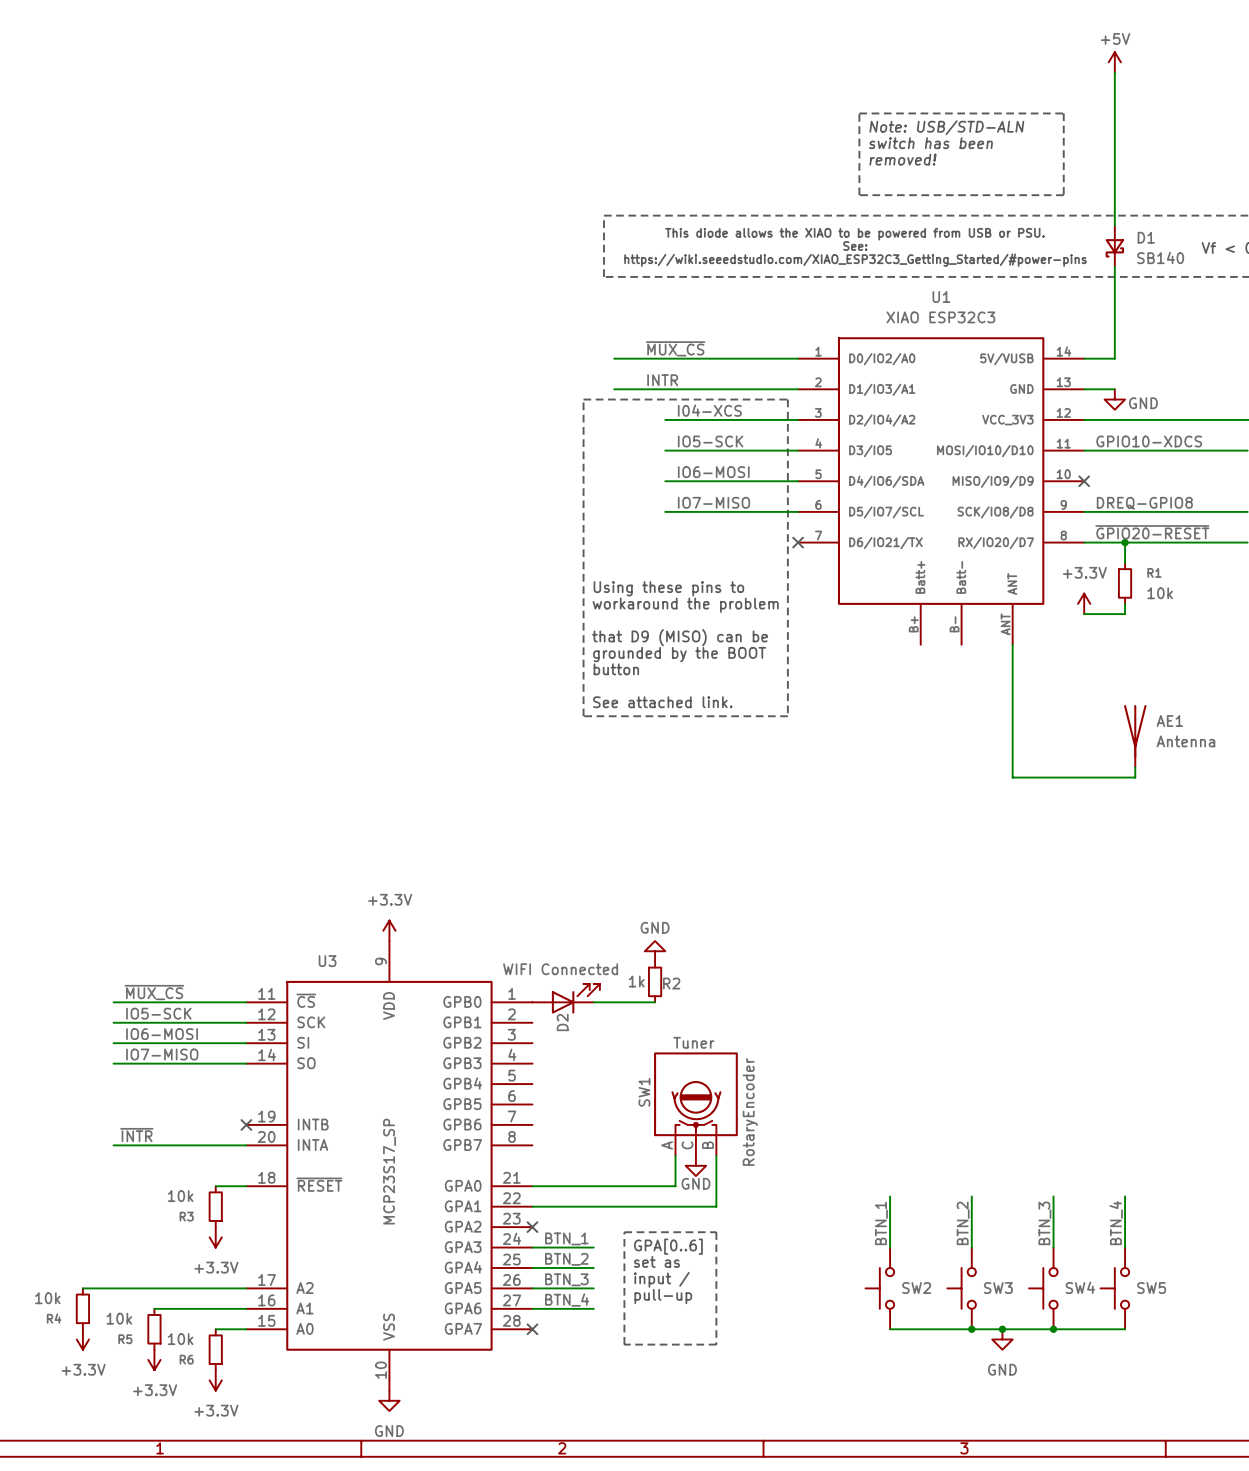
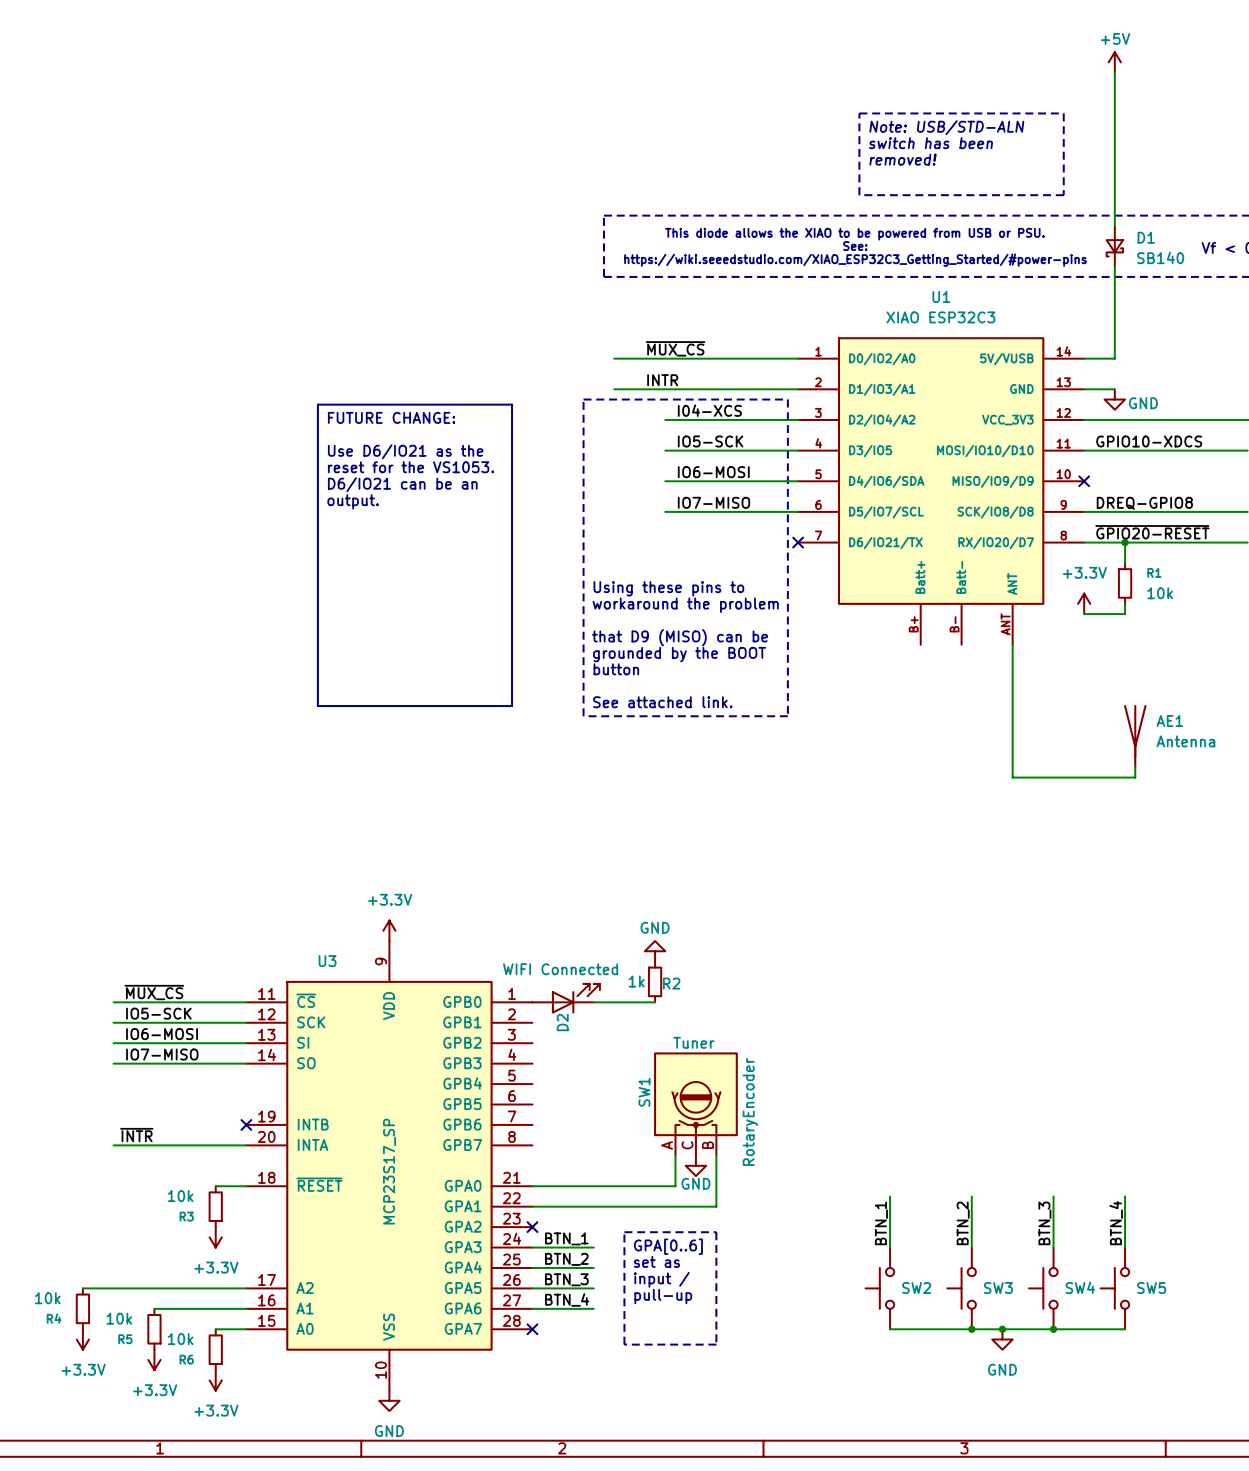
line: none -> (317, 404) (512, 404) (512, 706) (317, 706) (317, 404)
text: none -> FUTURE CHANGE: (391, 417)
text: none -> Use D6/IO21 as the (405, 451)
text: none -> reset for the VS1053. (411, 467)
text: none -> D6/IO21 can be an (402, 484)
text: none -> output. (353, 501)

